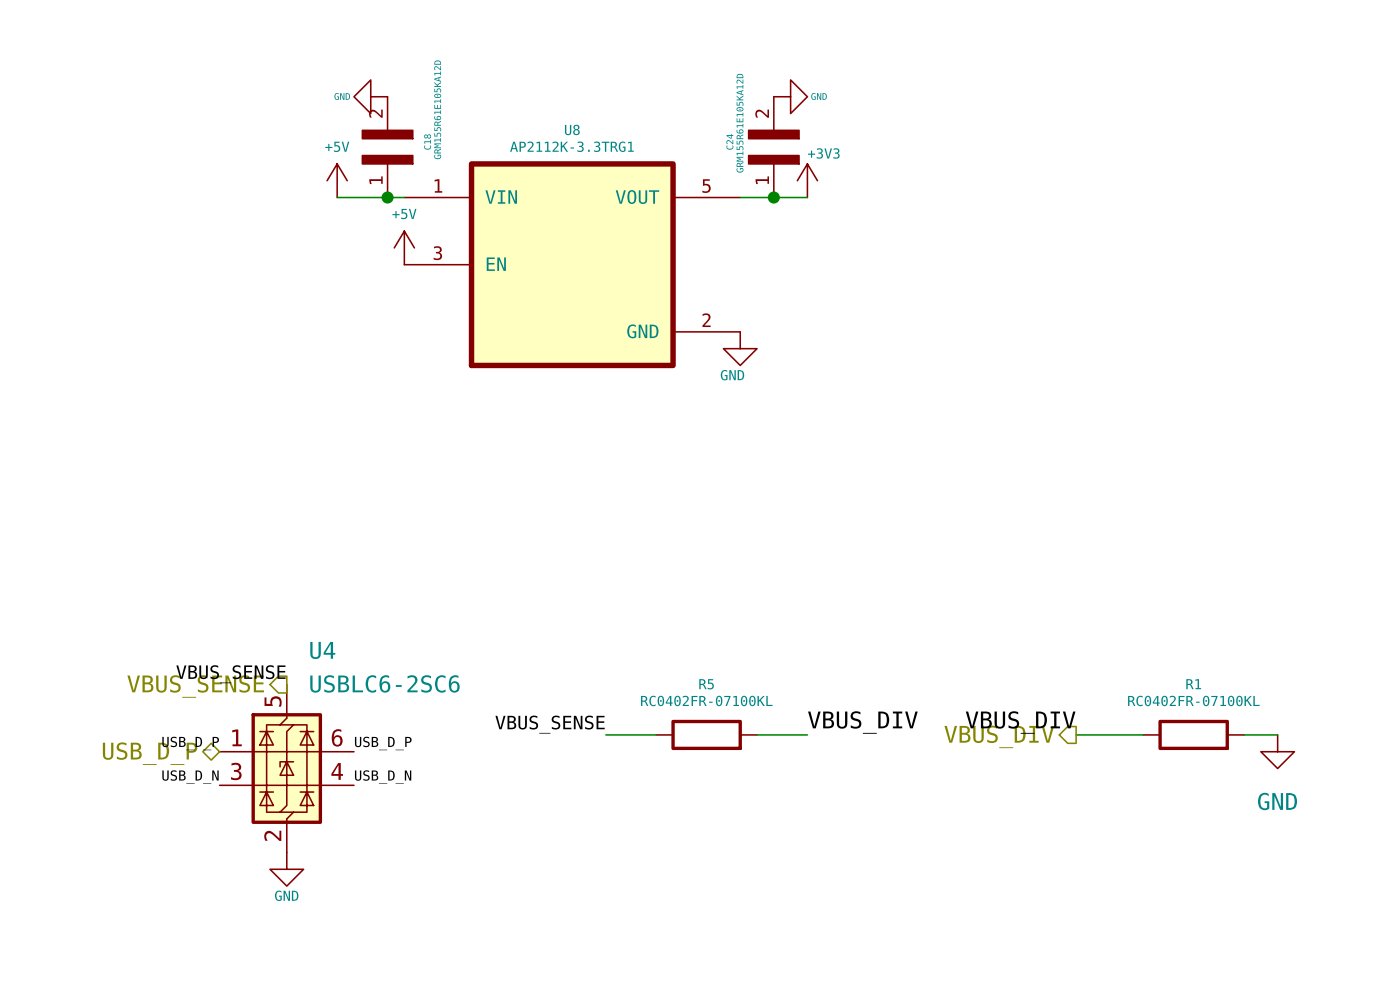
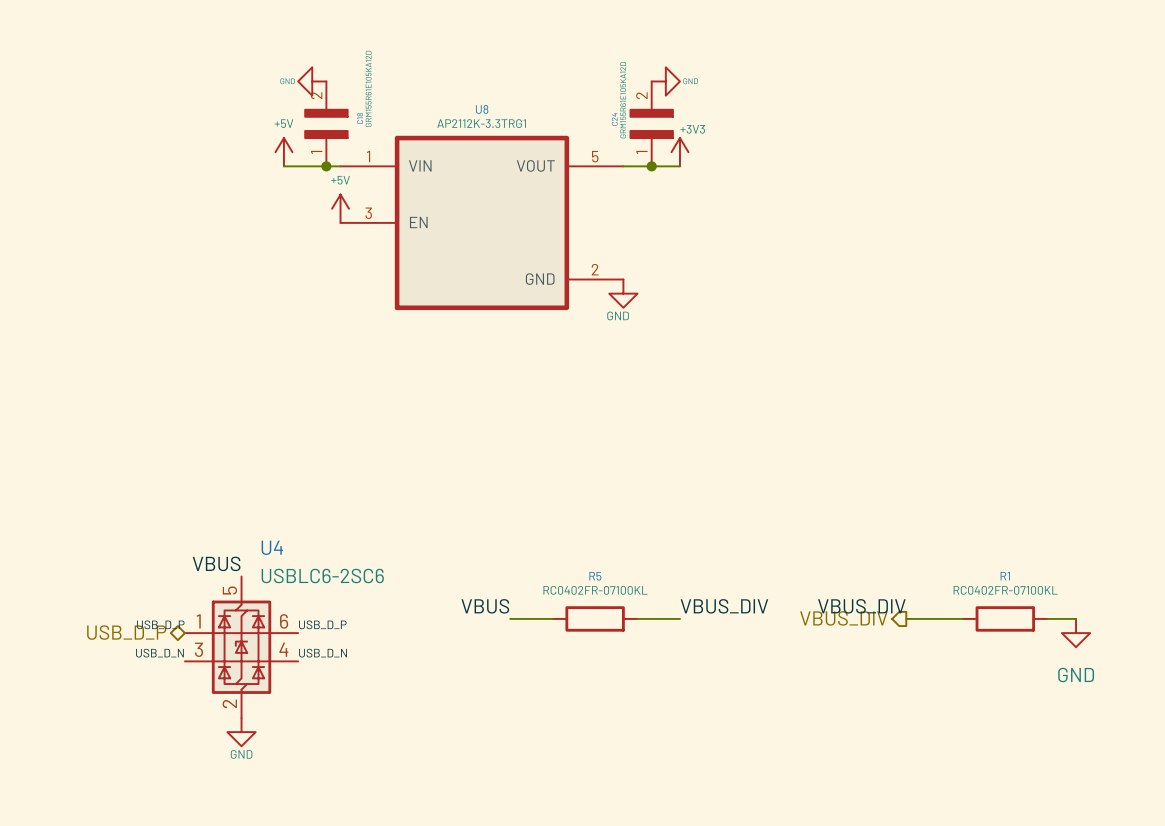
label: VBUS_SENSE (230, 674) -> VBUS (216, 563)
hierarchical label: VBUS_SENSE (195, 686) -> none
label: VBUS_SENSE (550, 724) -> VBUS (485, 606)

